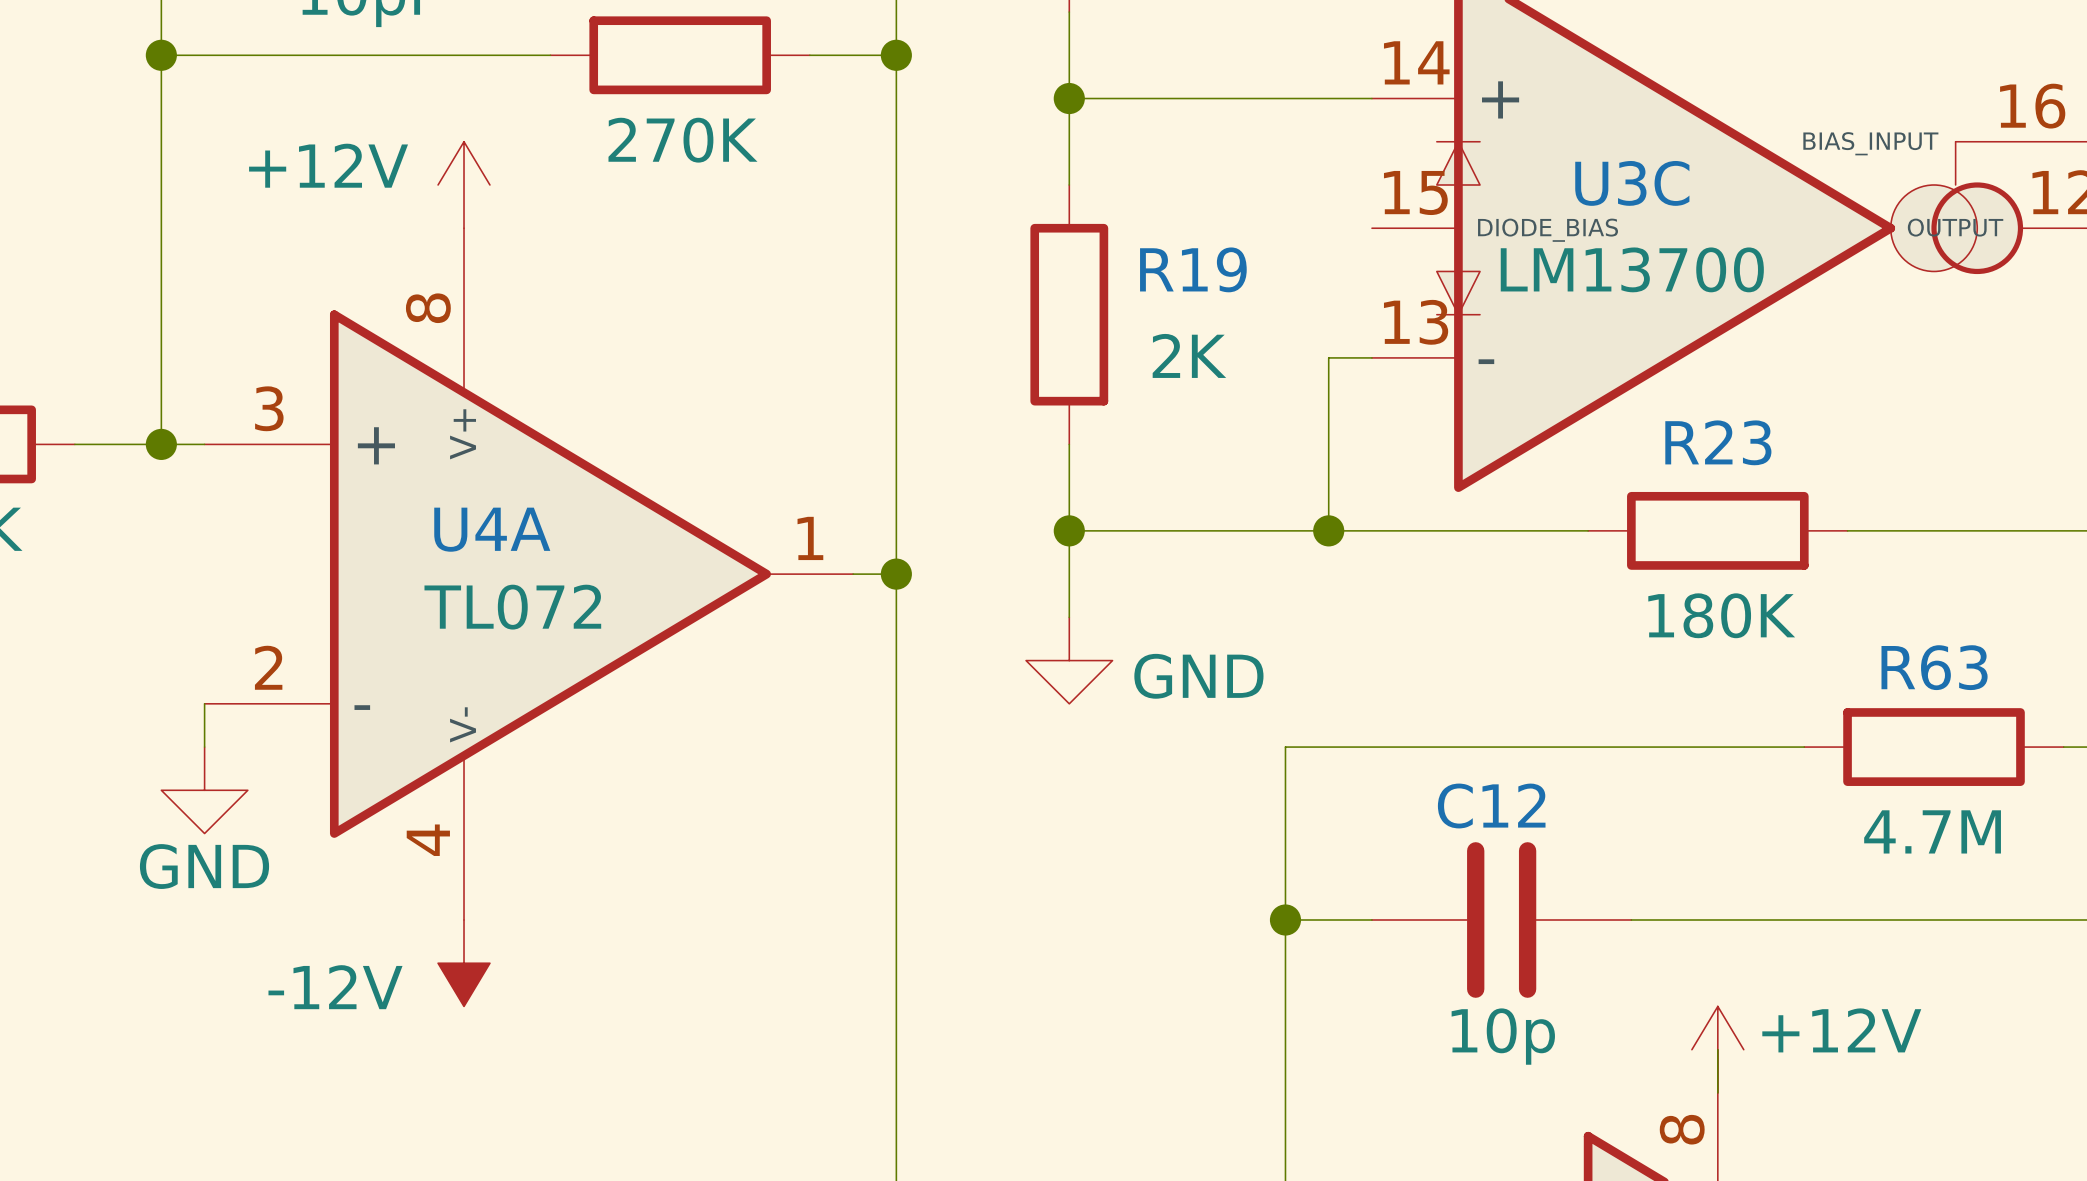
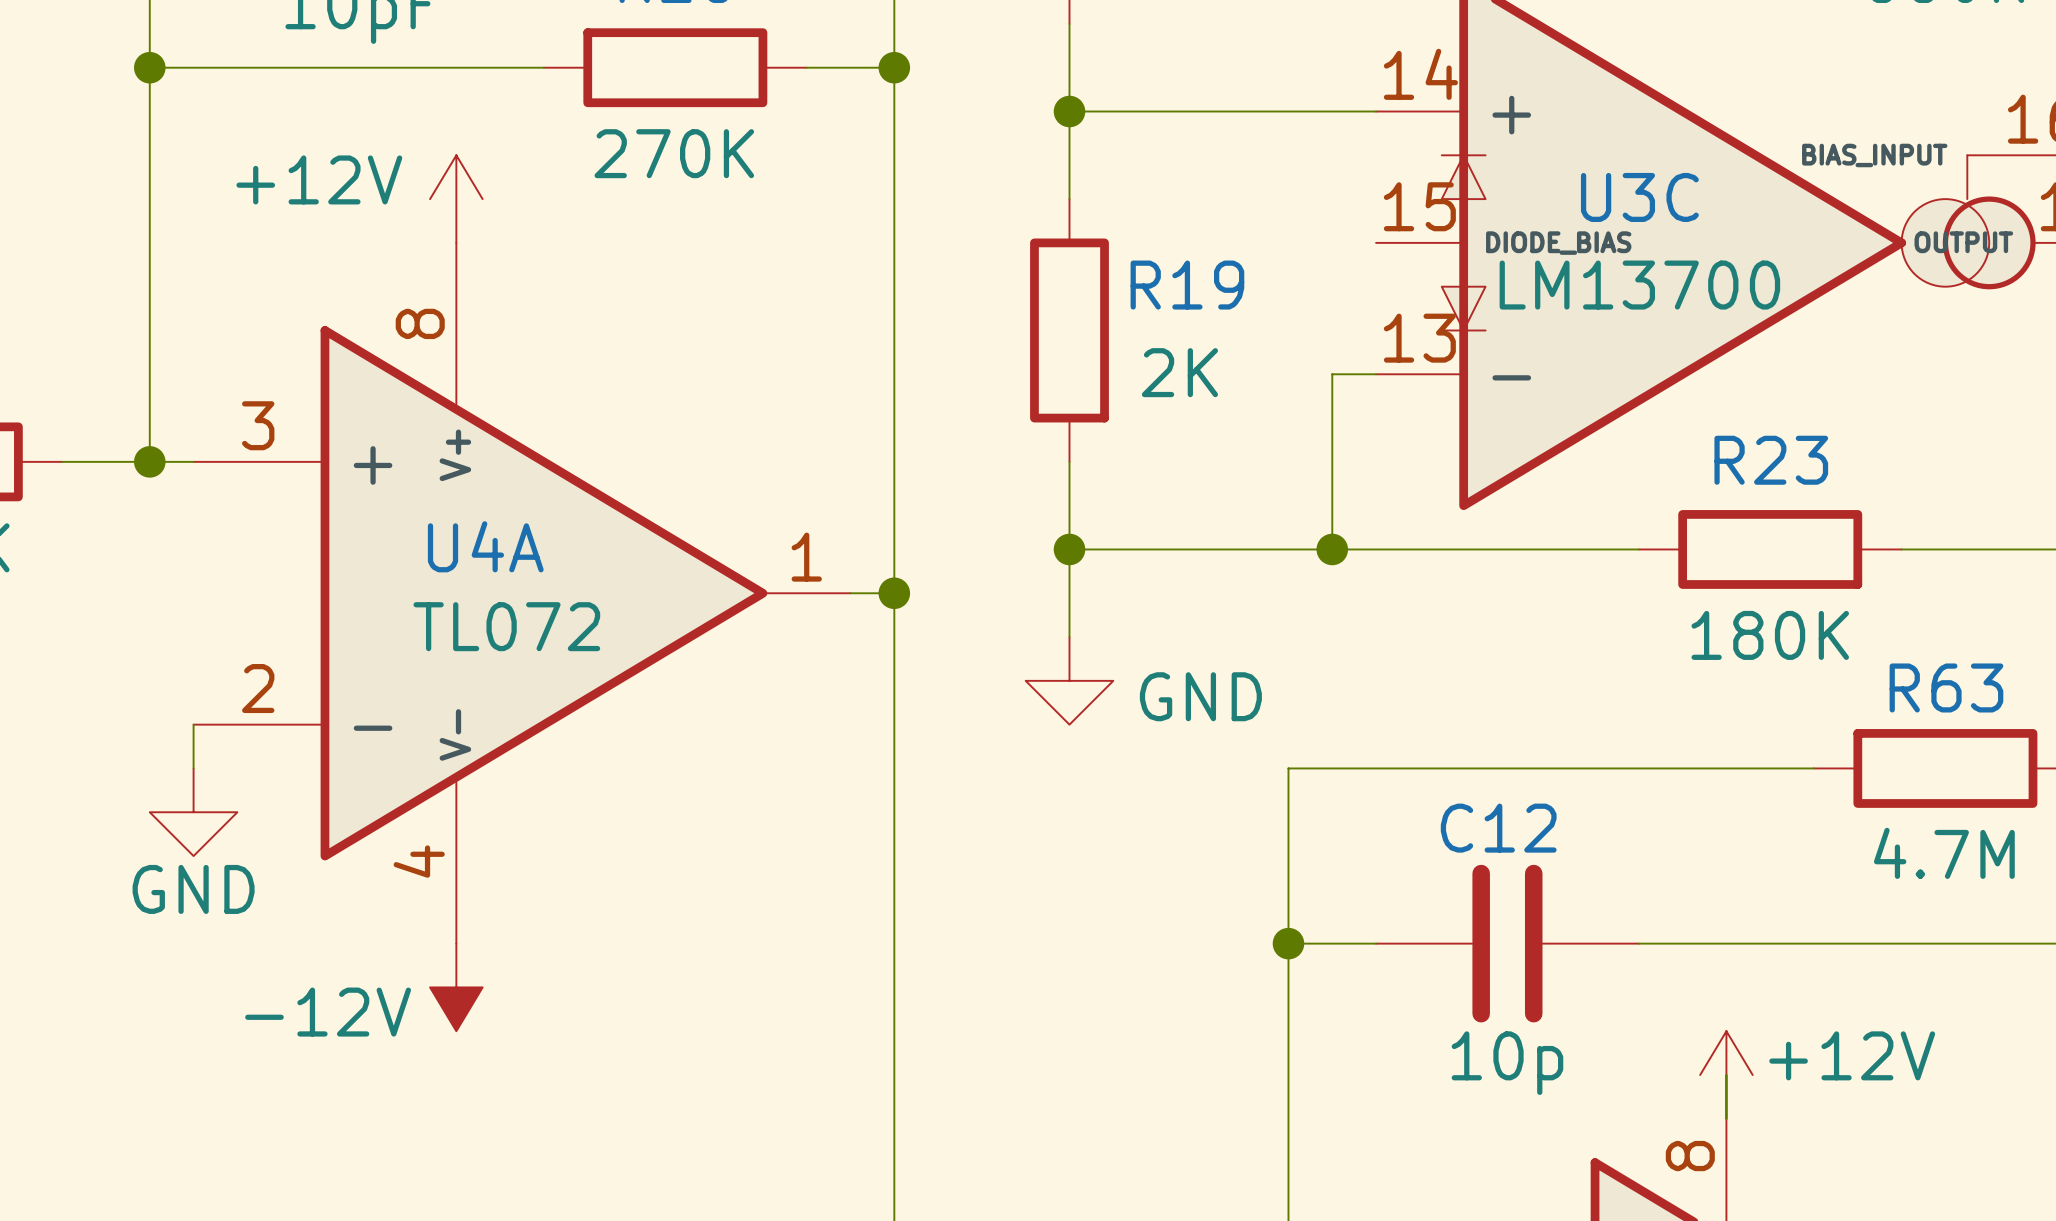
R23 position: (1717, 530) -> (1770, 549)

